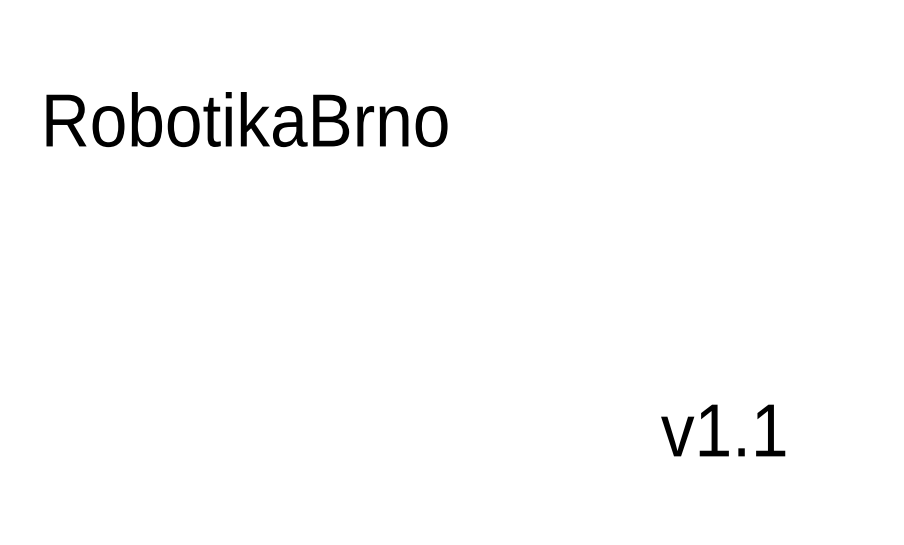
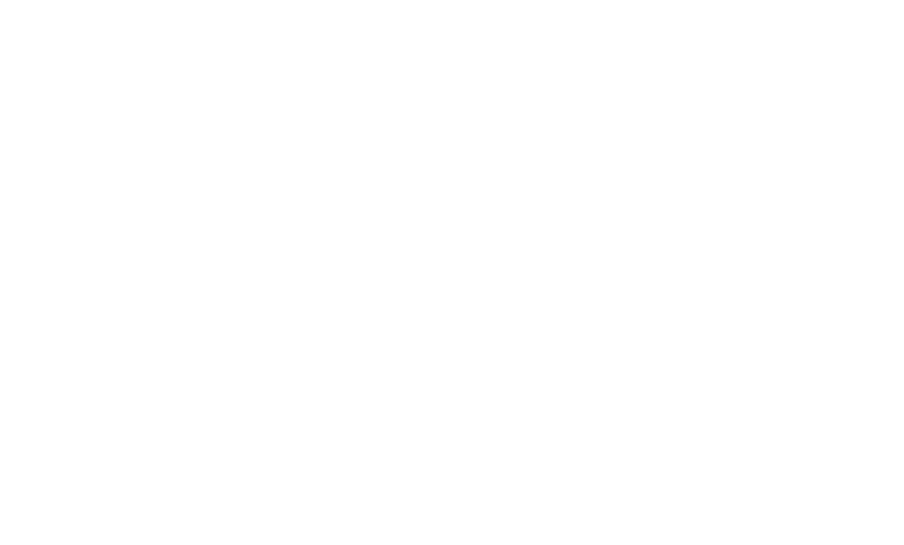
text: RobotikaBrno (247, 119) -> none
text: v1.1 (723, 430) -> none

